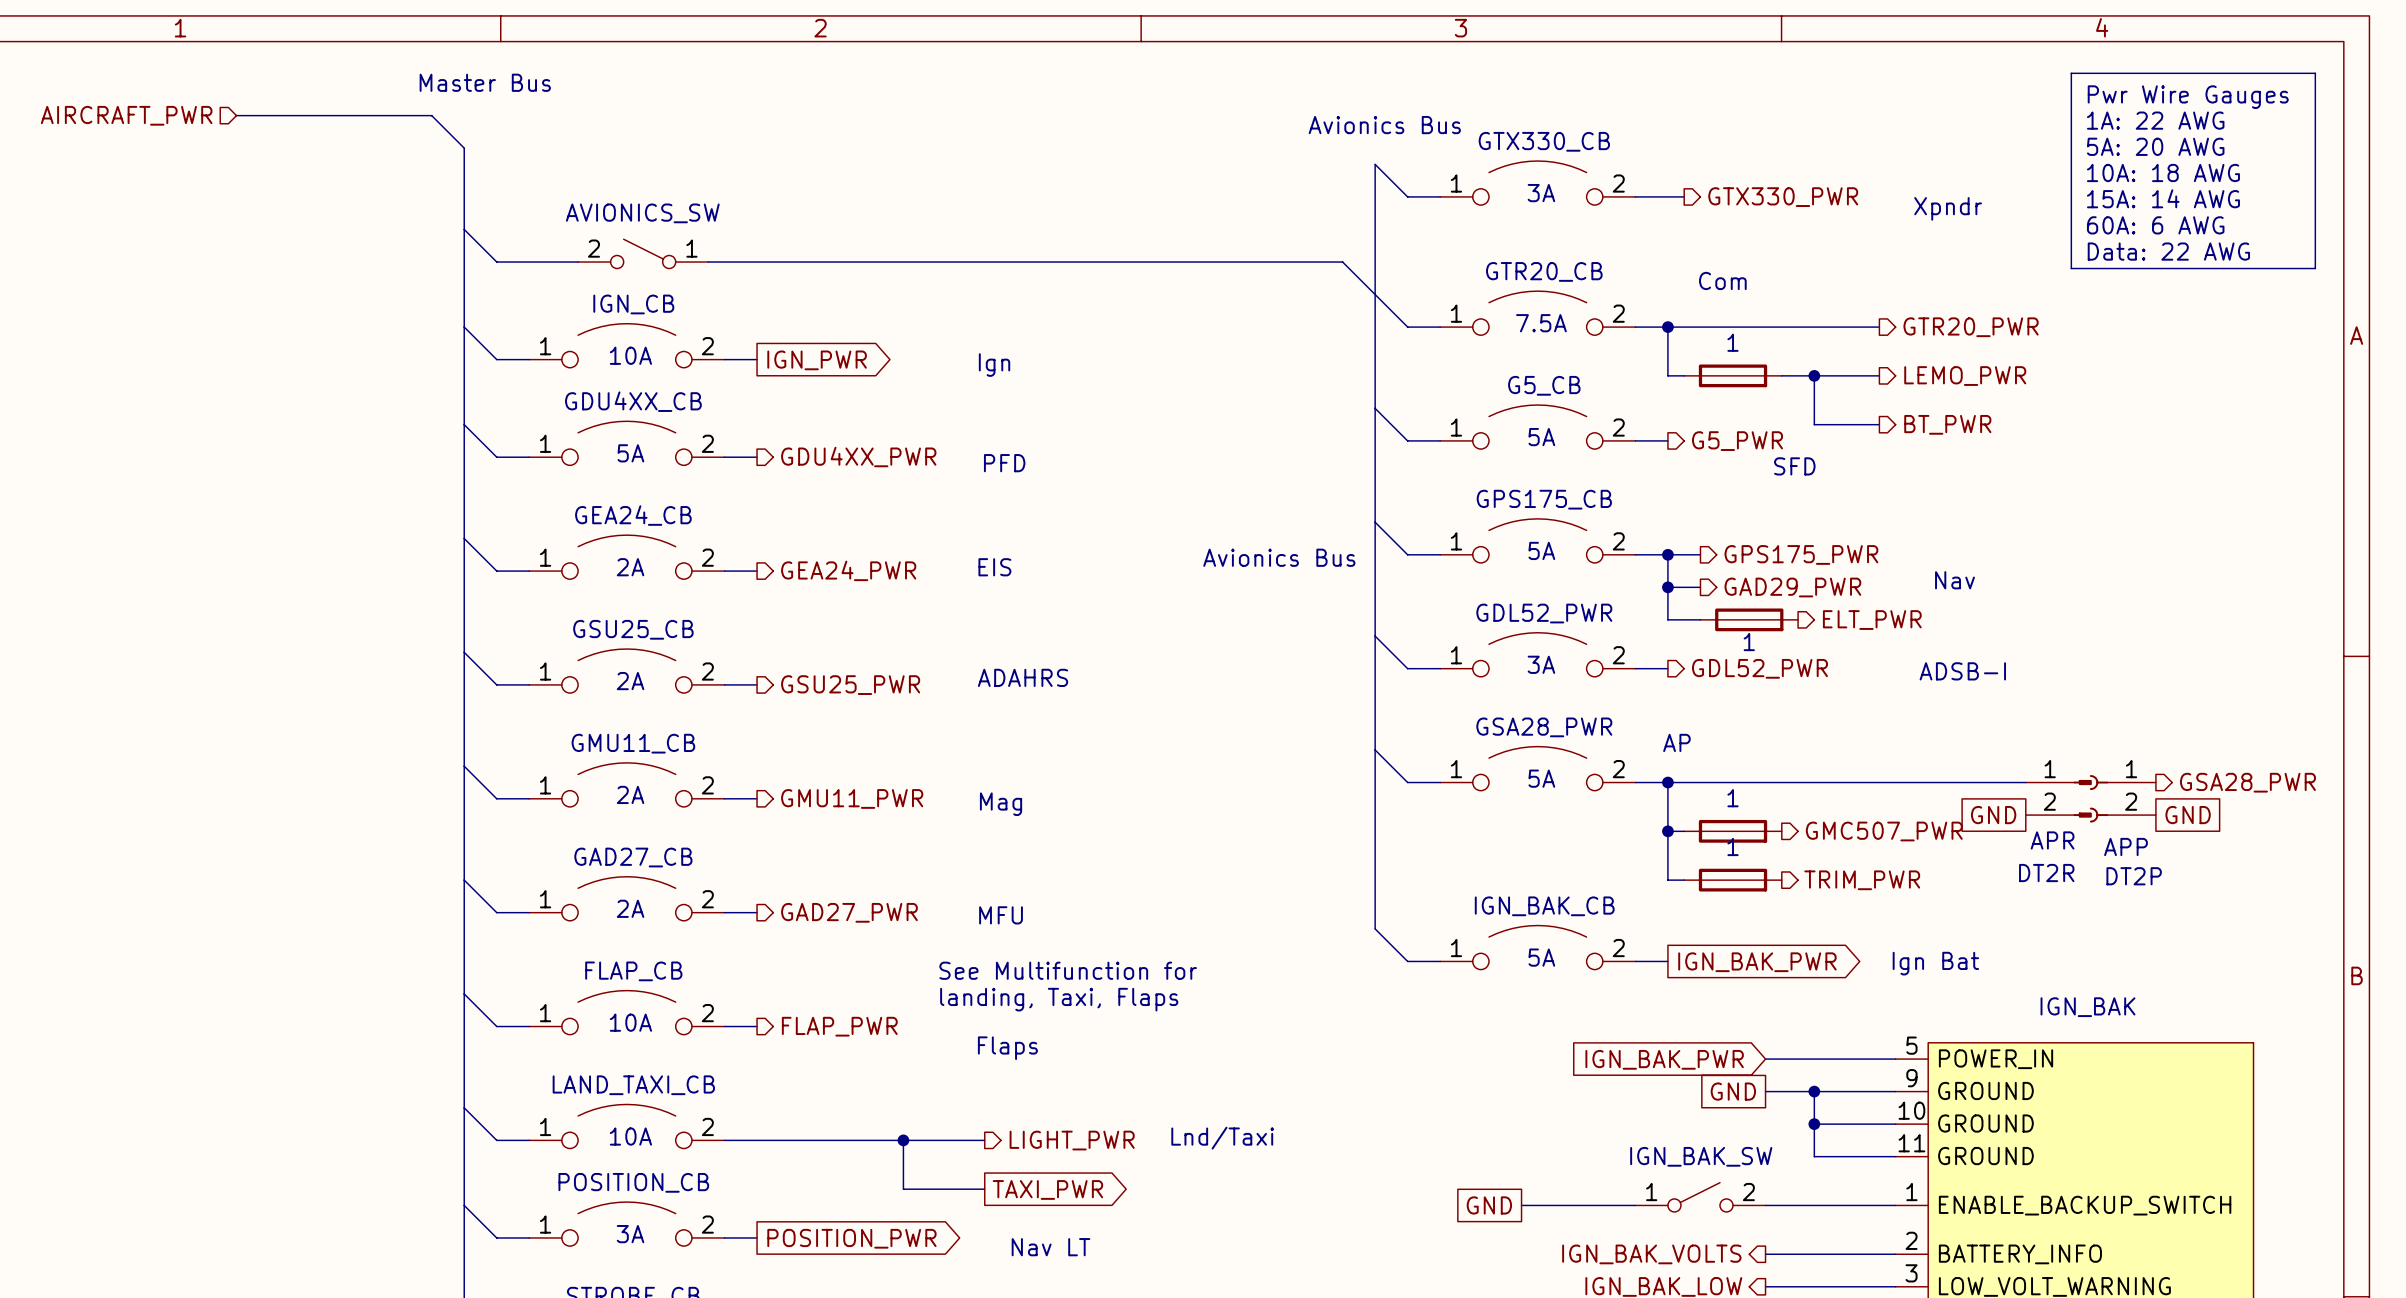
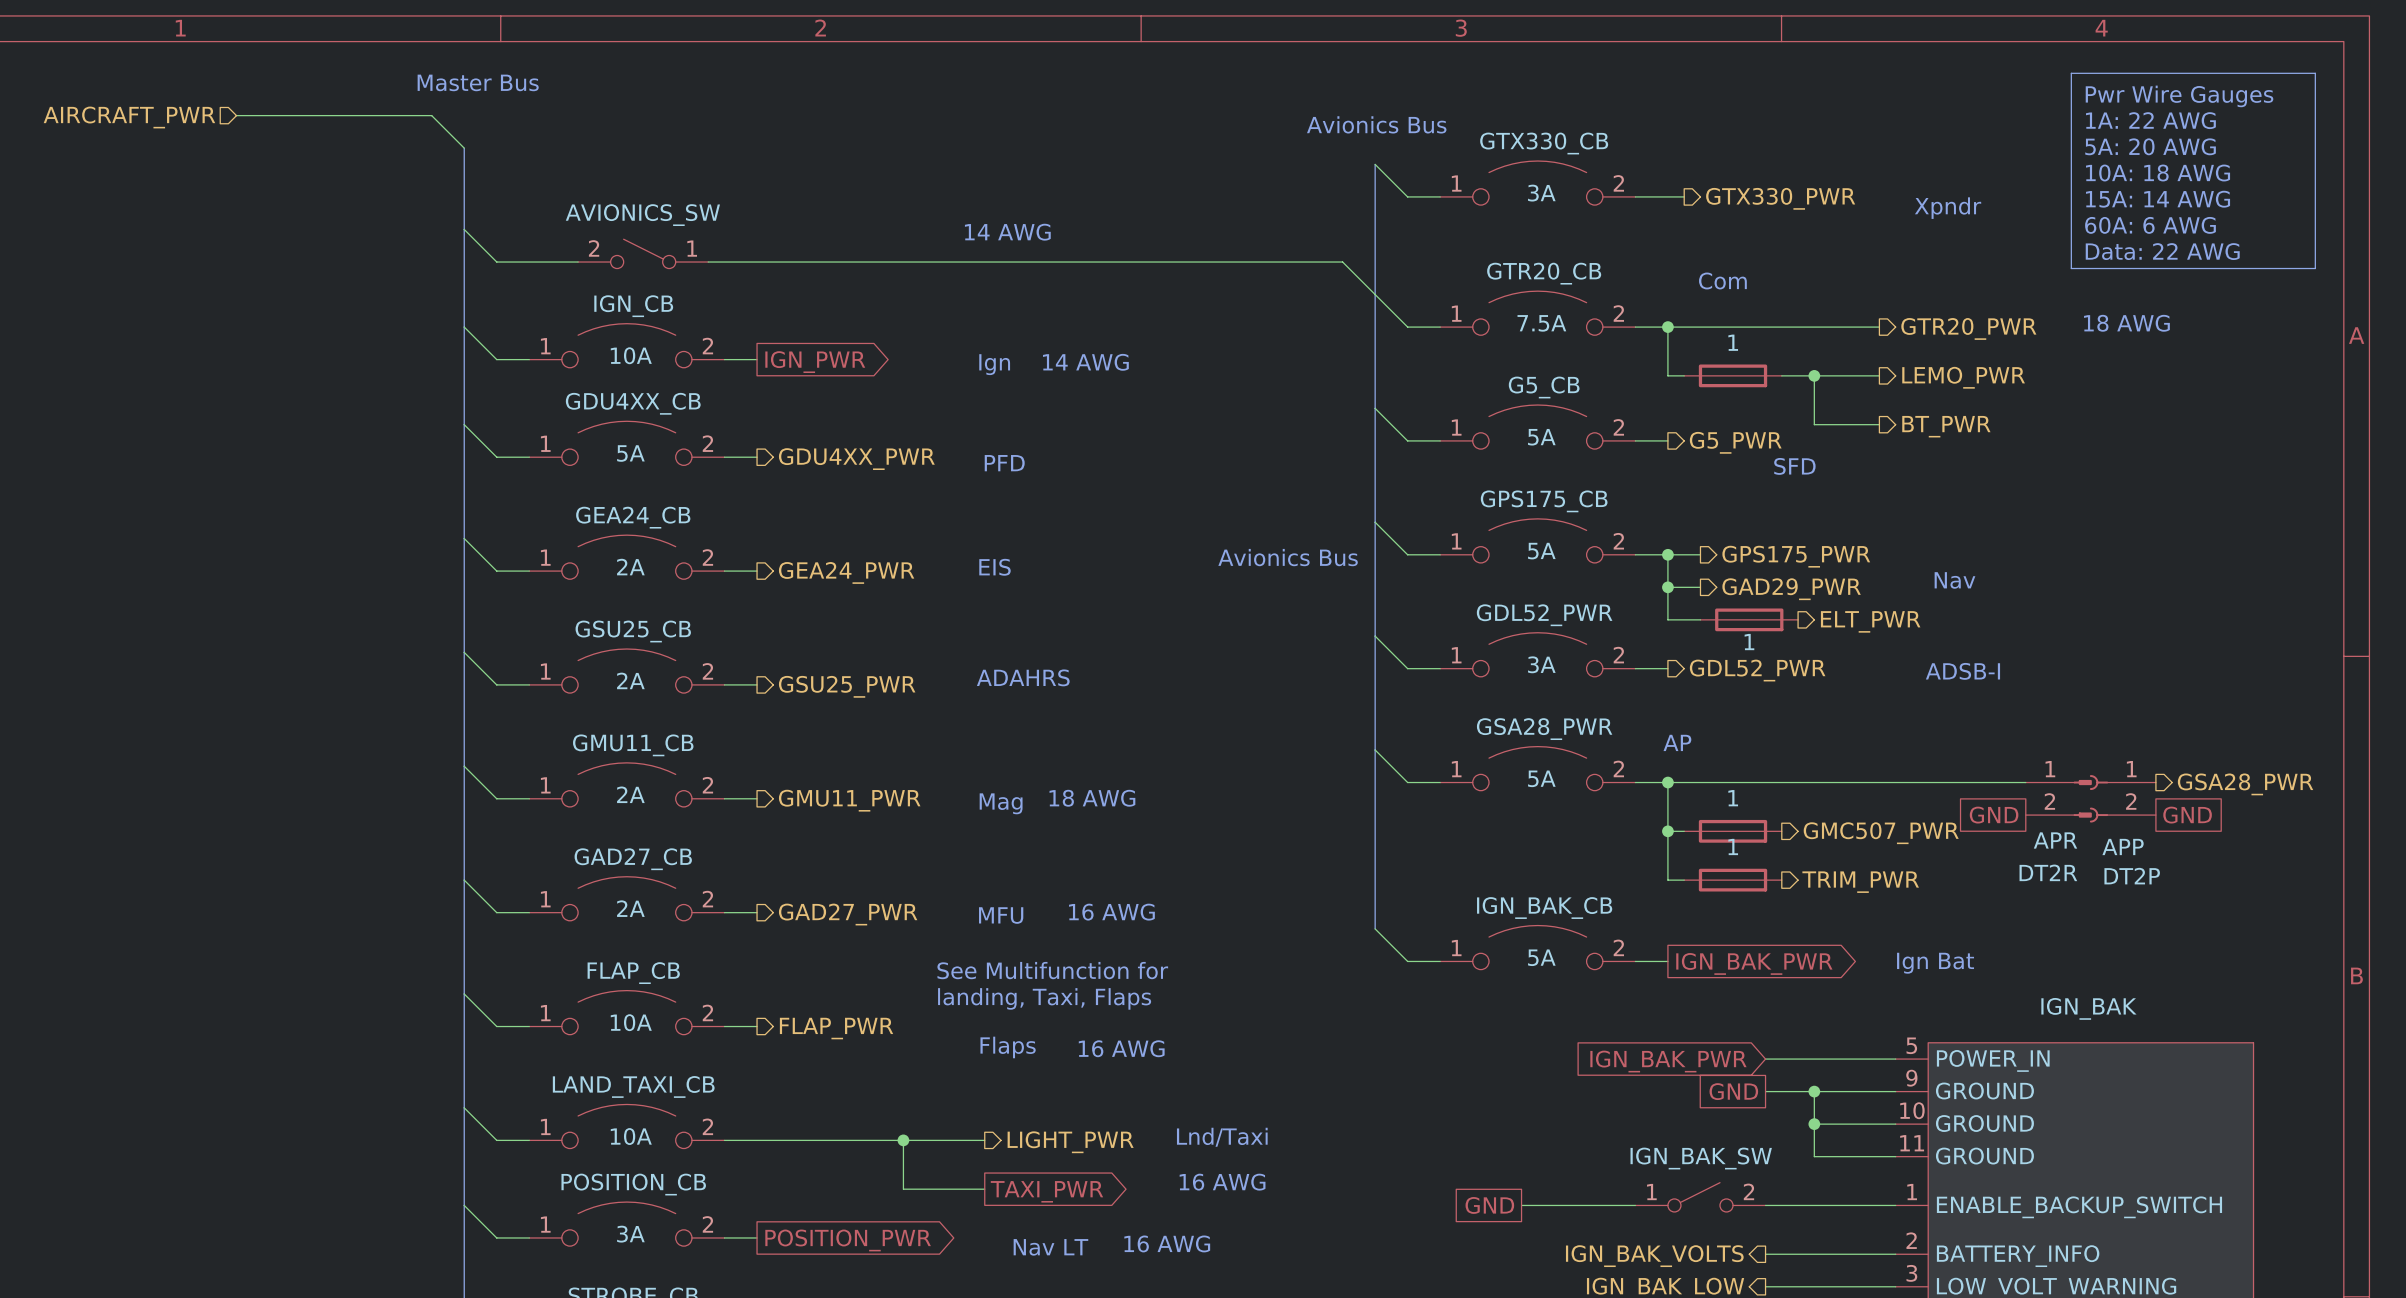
text: none -> 14 AWG (1007, 232)
text: none -> 18 AWG (2126, 323)
text: none -> 14 AWG (1085, 362)
text: none -> 18 AWG (1092, 798)
text: none -> 16 AWG (1111, 912)
text: none -> 16 AWG (1121, 1048)
text: none -> 16 AWG (1222, 1182)
text: none -> 16 AWG (1167, 1243)

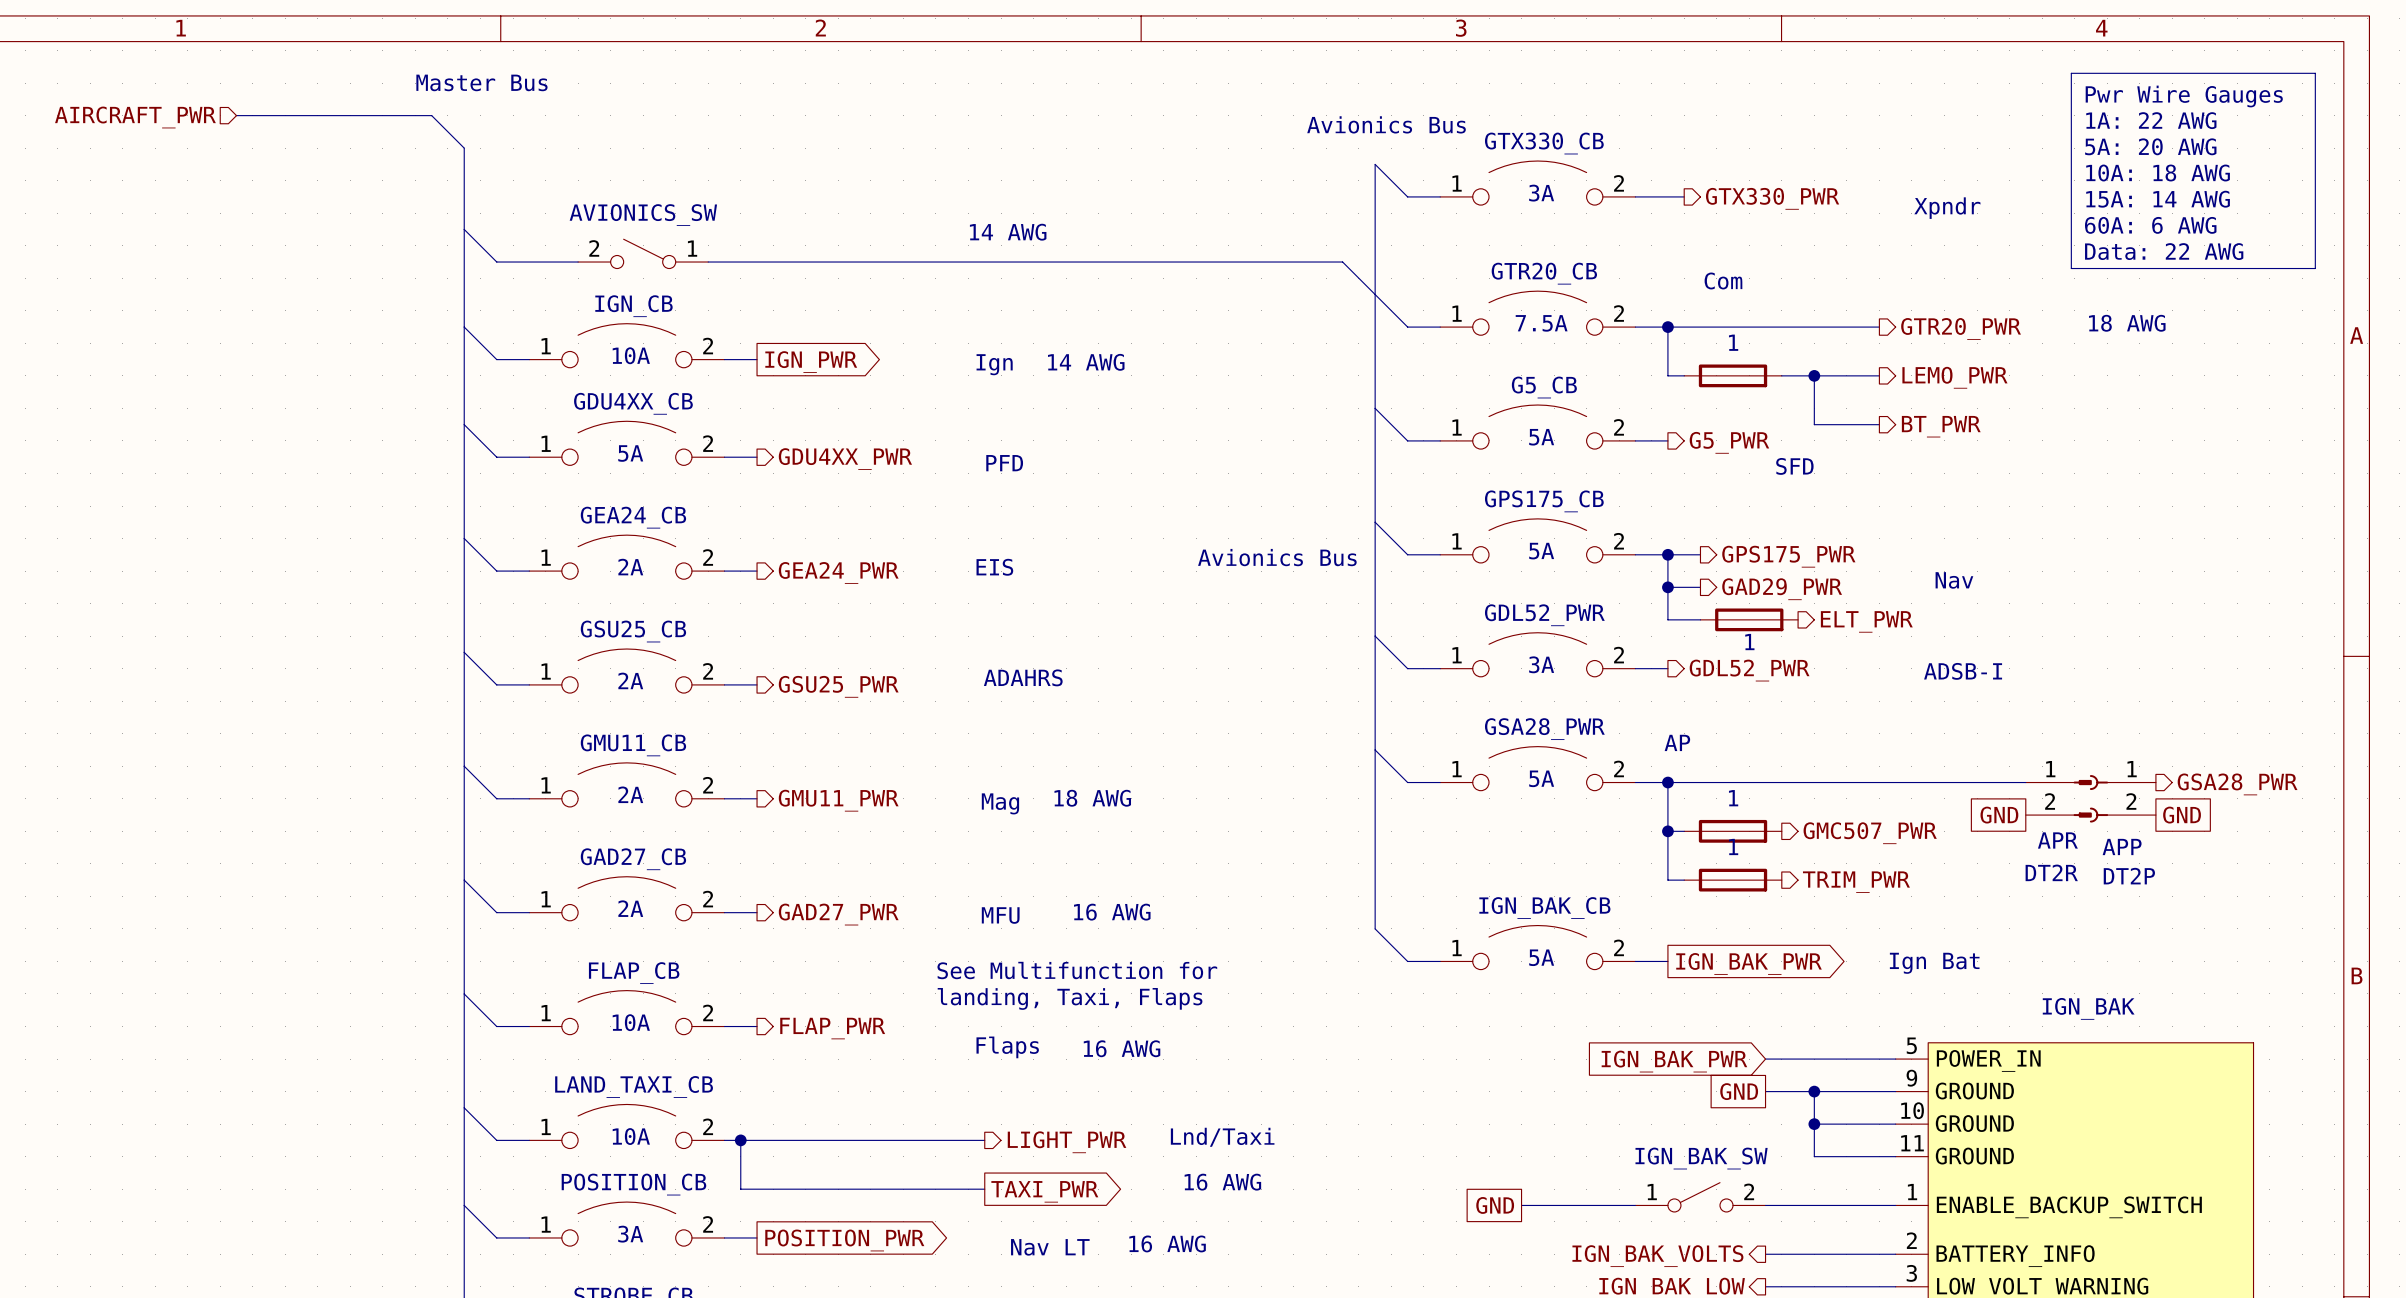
junction: none -> (740, 1140)
wire: (903, 1140) (903, 1189) -> (740, 1140) (740, 1189) (903, 1189)
junction: (903, 1140) -> none

